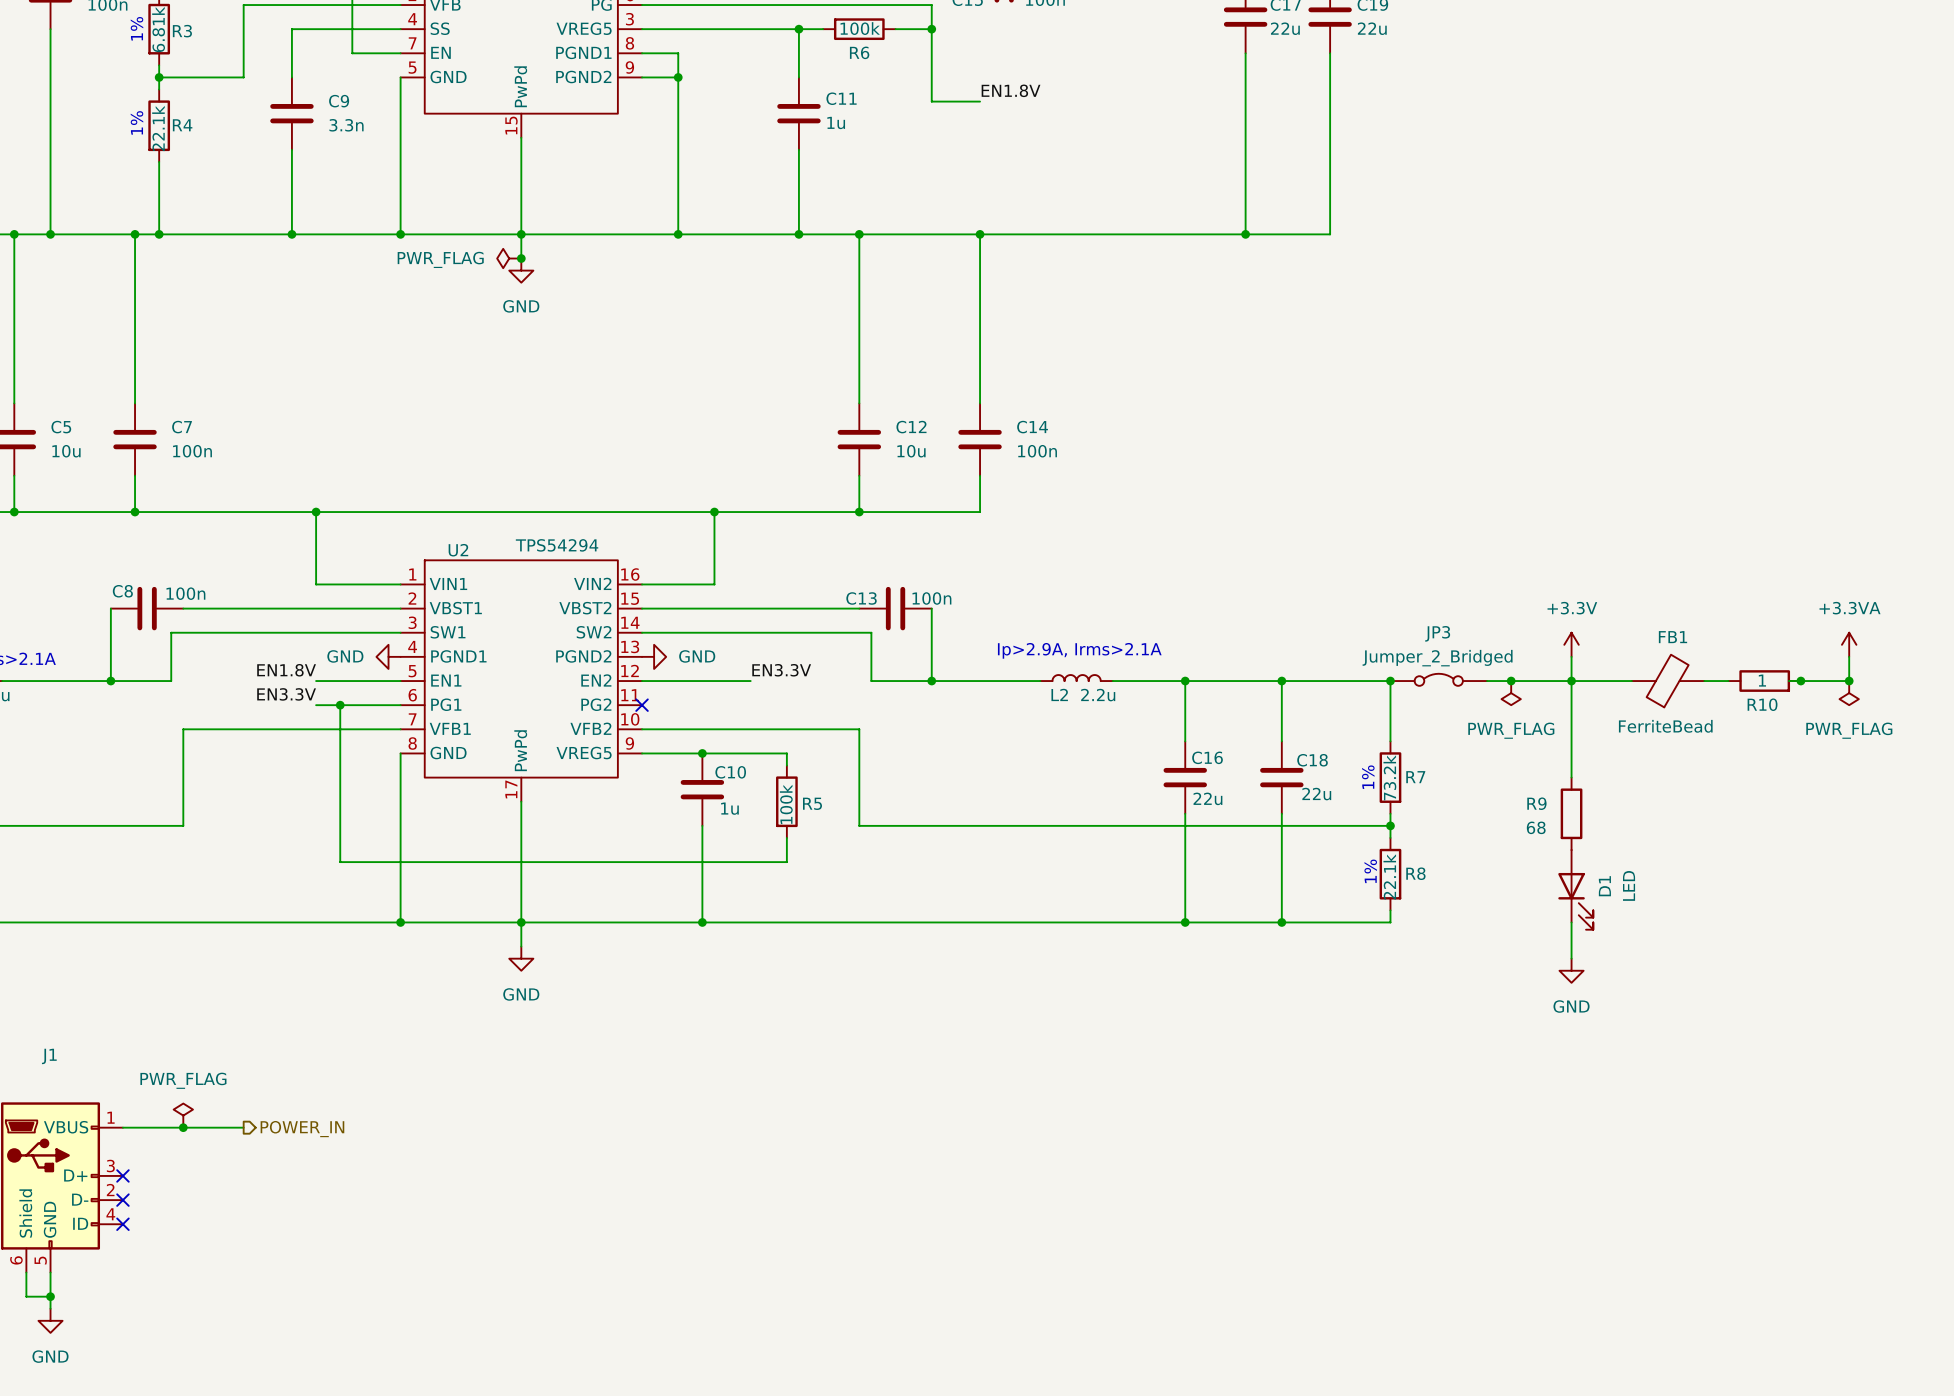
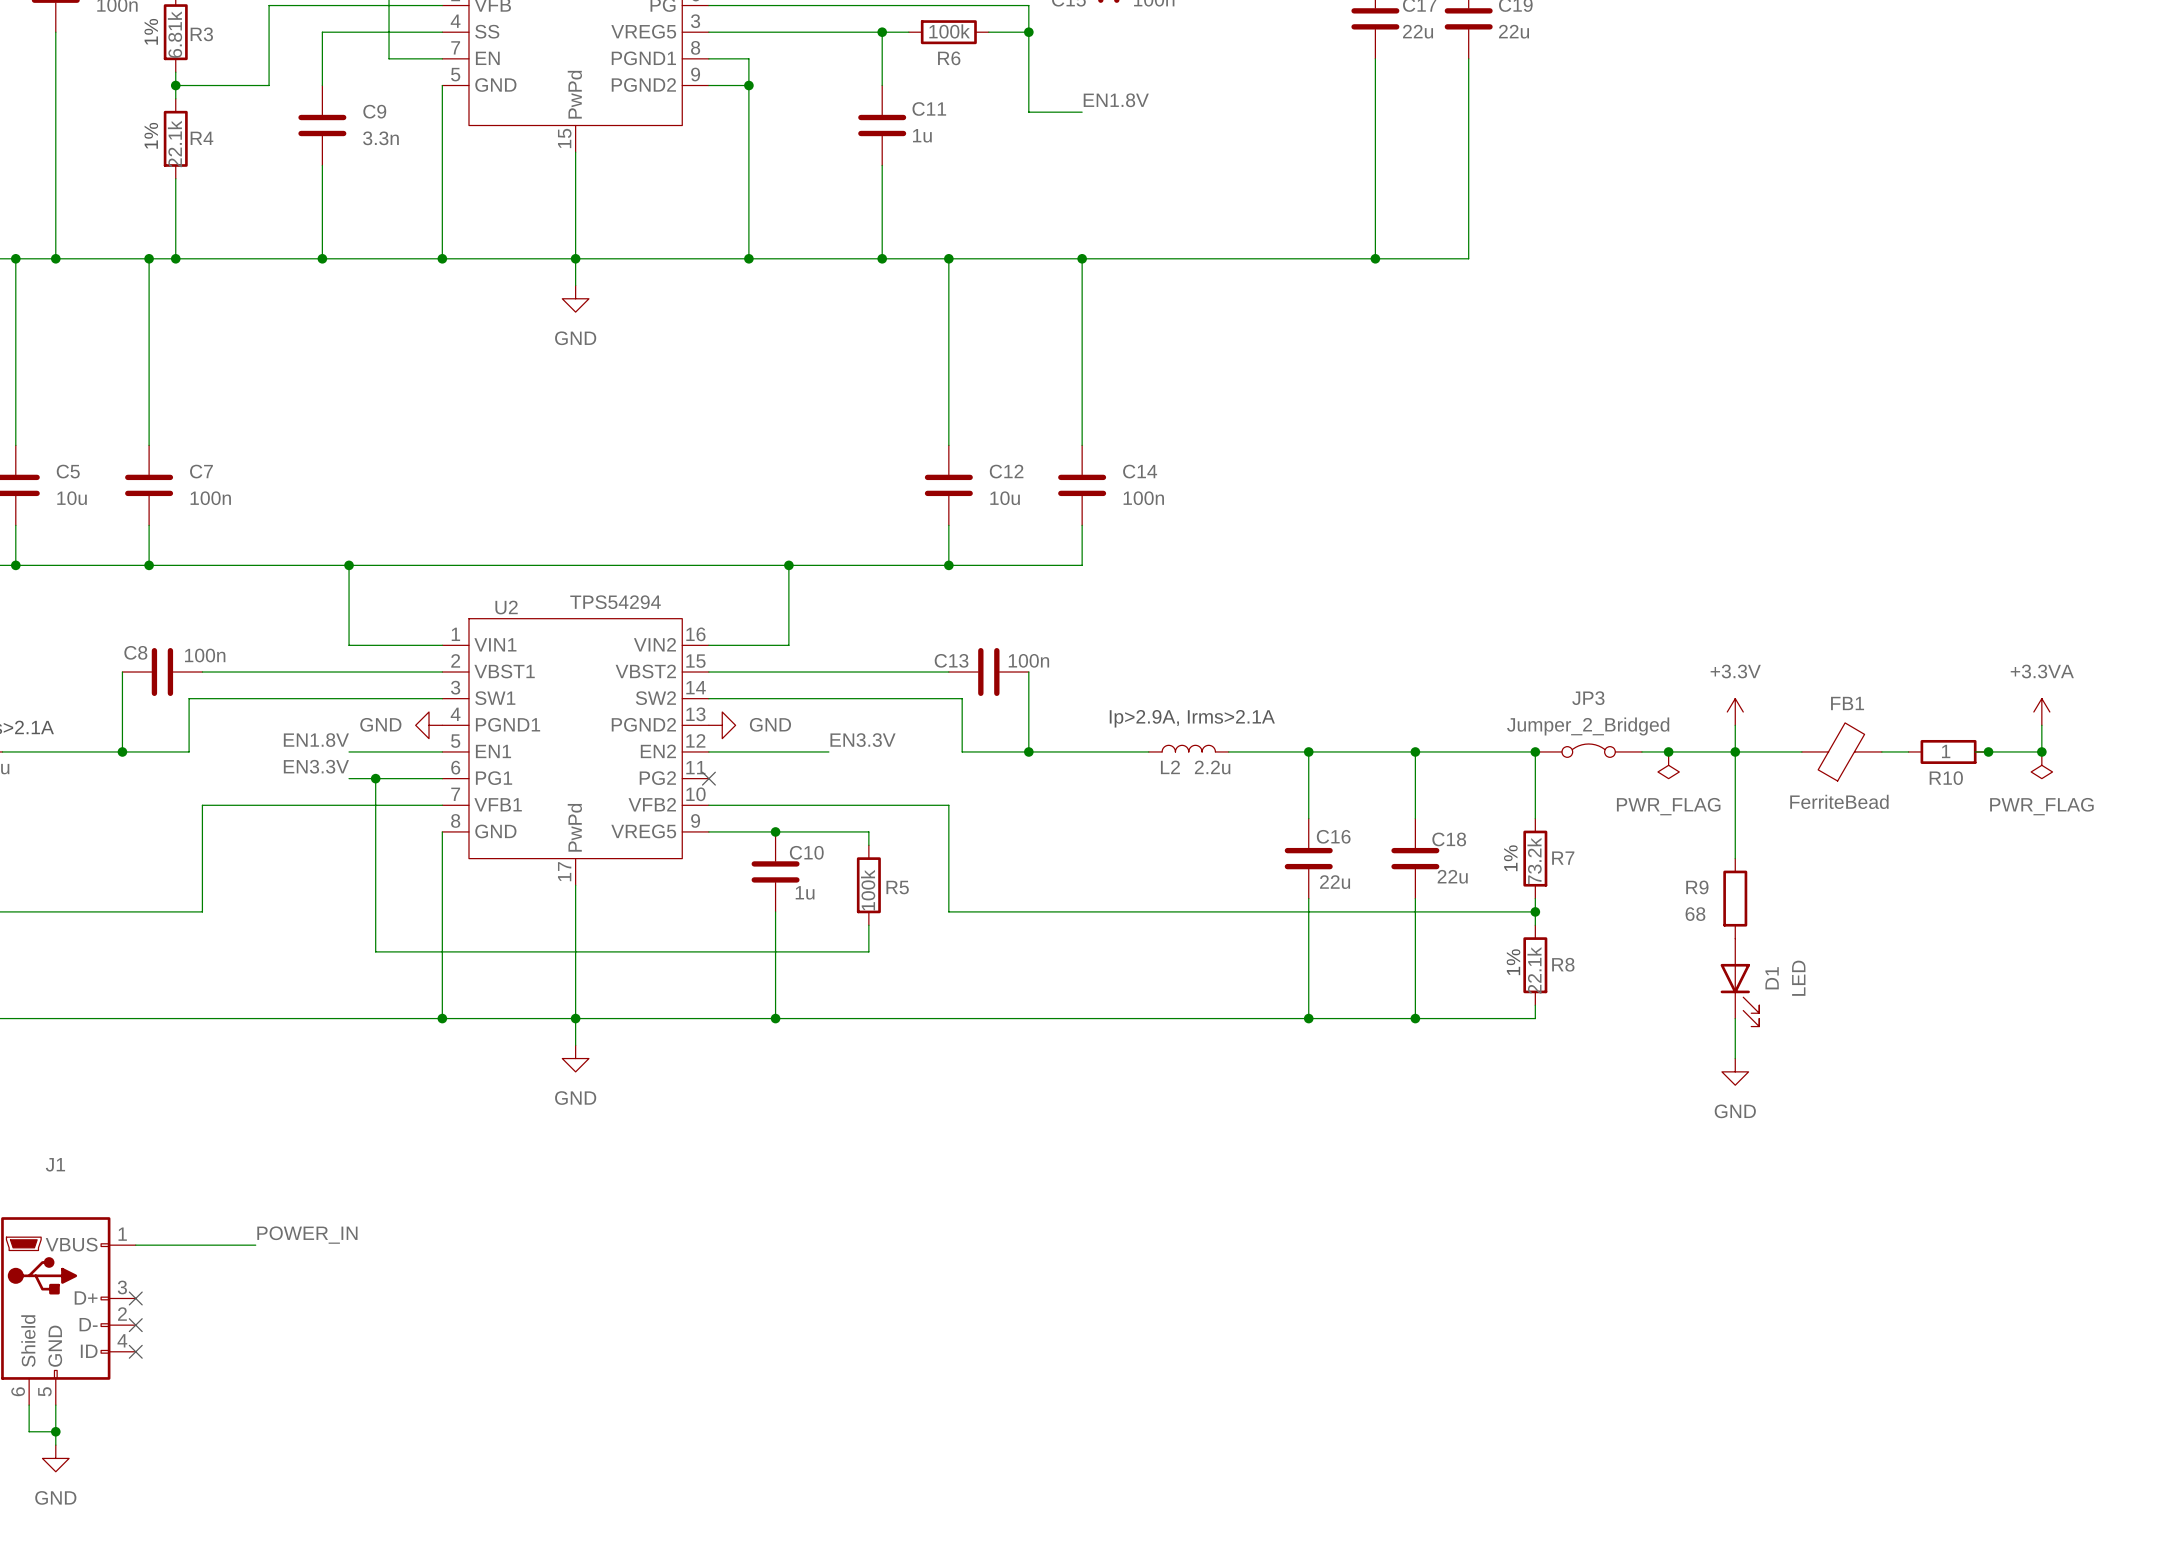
power symbol: PWR_FLAG (509, 258) -> none
junction: (521, 258) -> none
power symbol: PWR_FLAG (183, 1115) -> none
label: none -> POWER_IN (307, 1235)
junction: (183, 1127) -> none
wire: (231, 1127) (243, 1127) -> none
hierarchical label: POWER_IN (302, 1129) -> none

